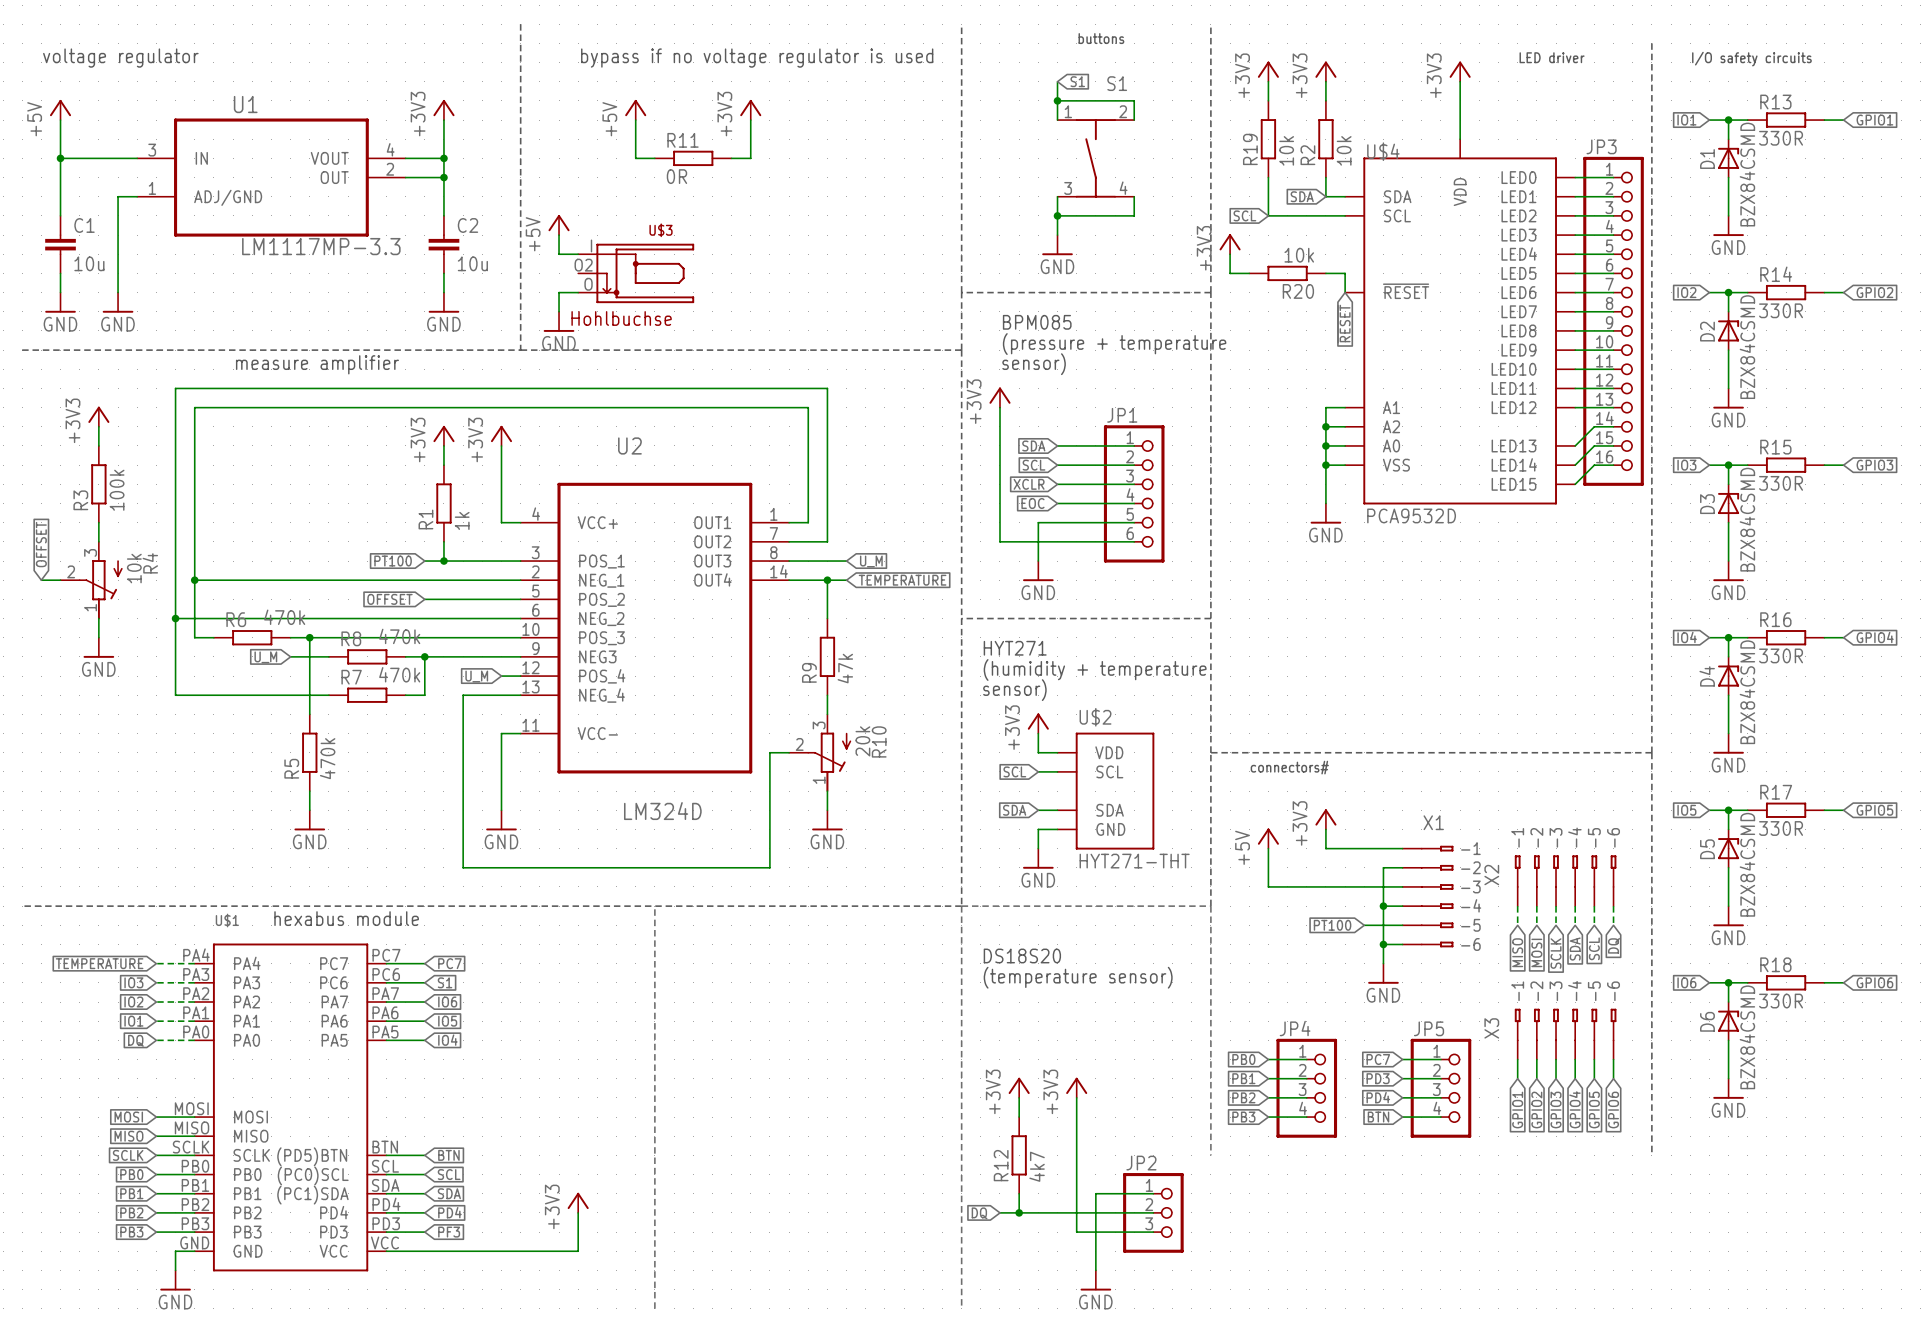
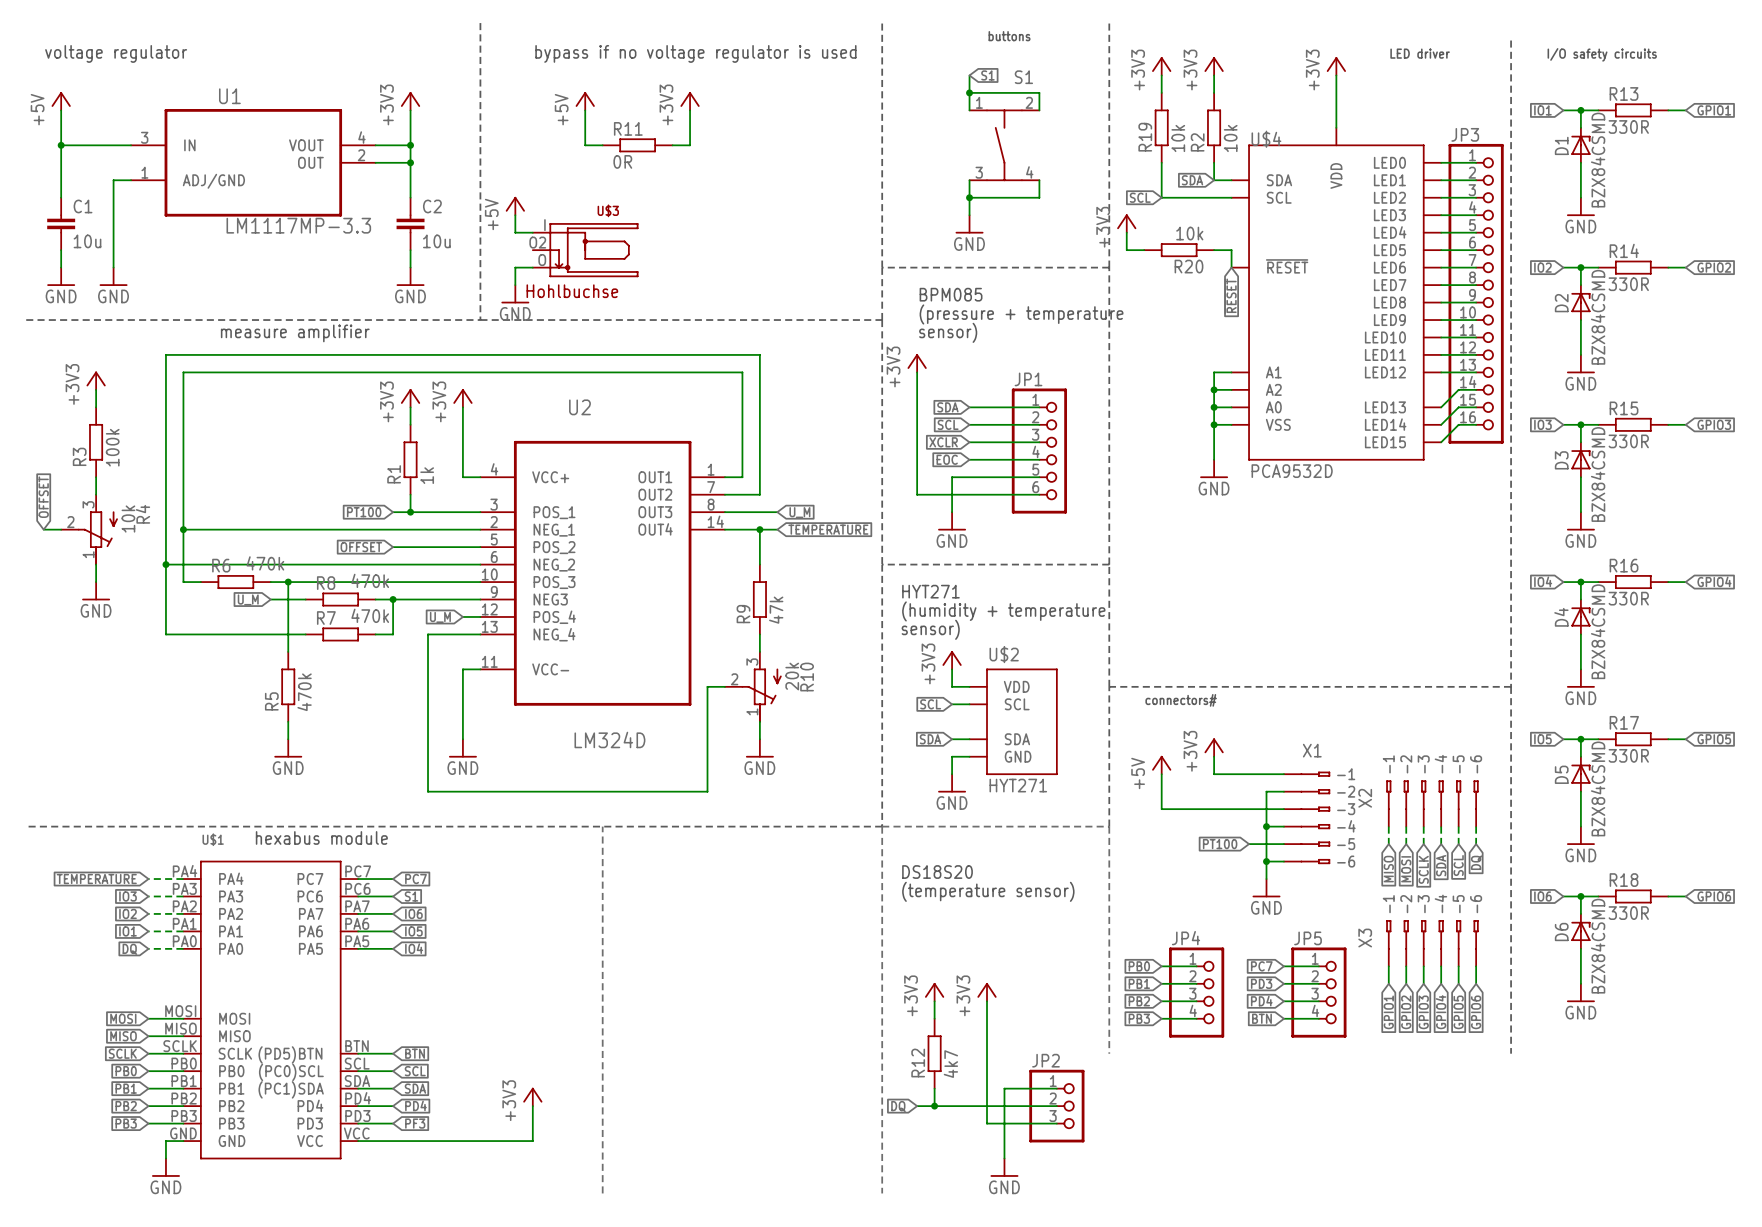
U$2 value: HYT271-THT (1134, 861) -> HYT271 (1018, 785)

